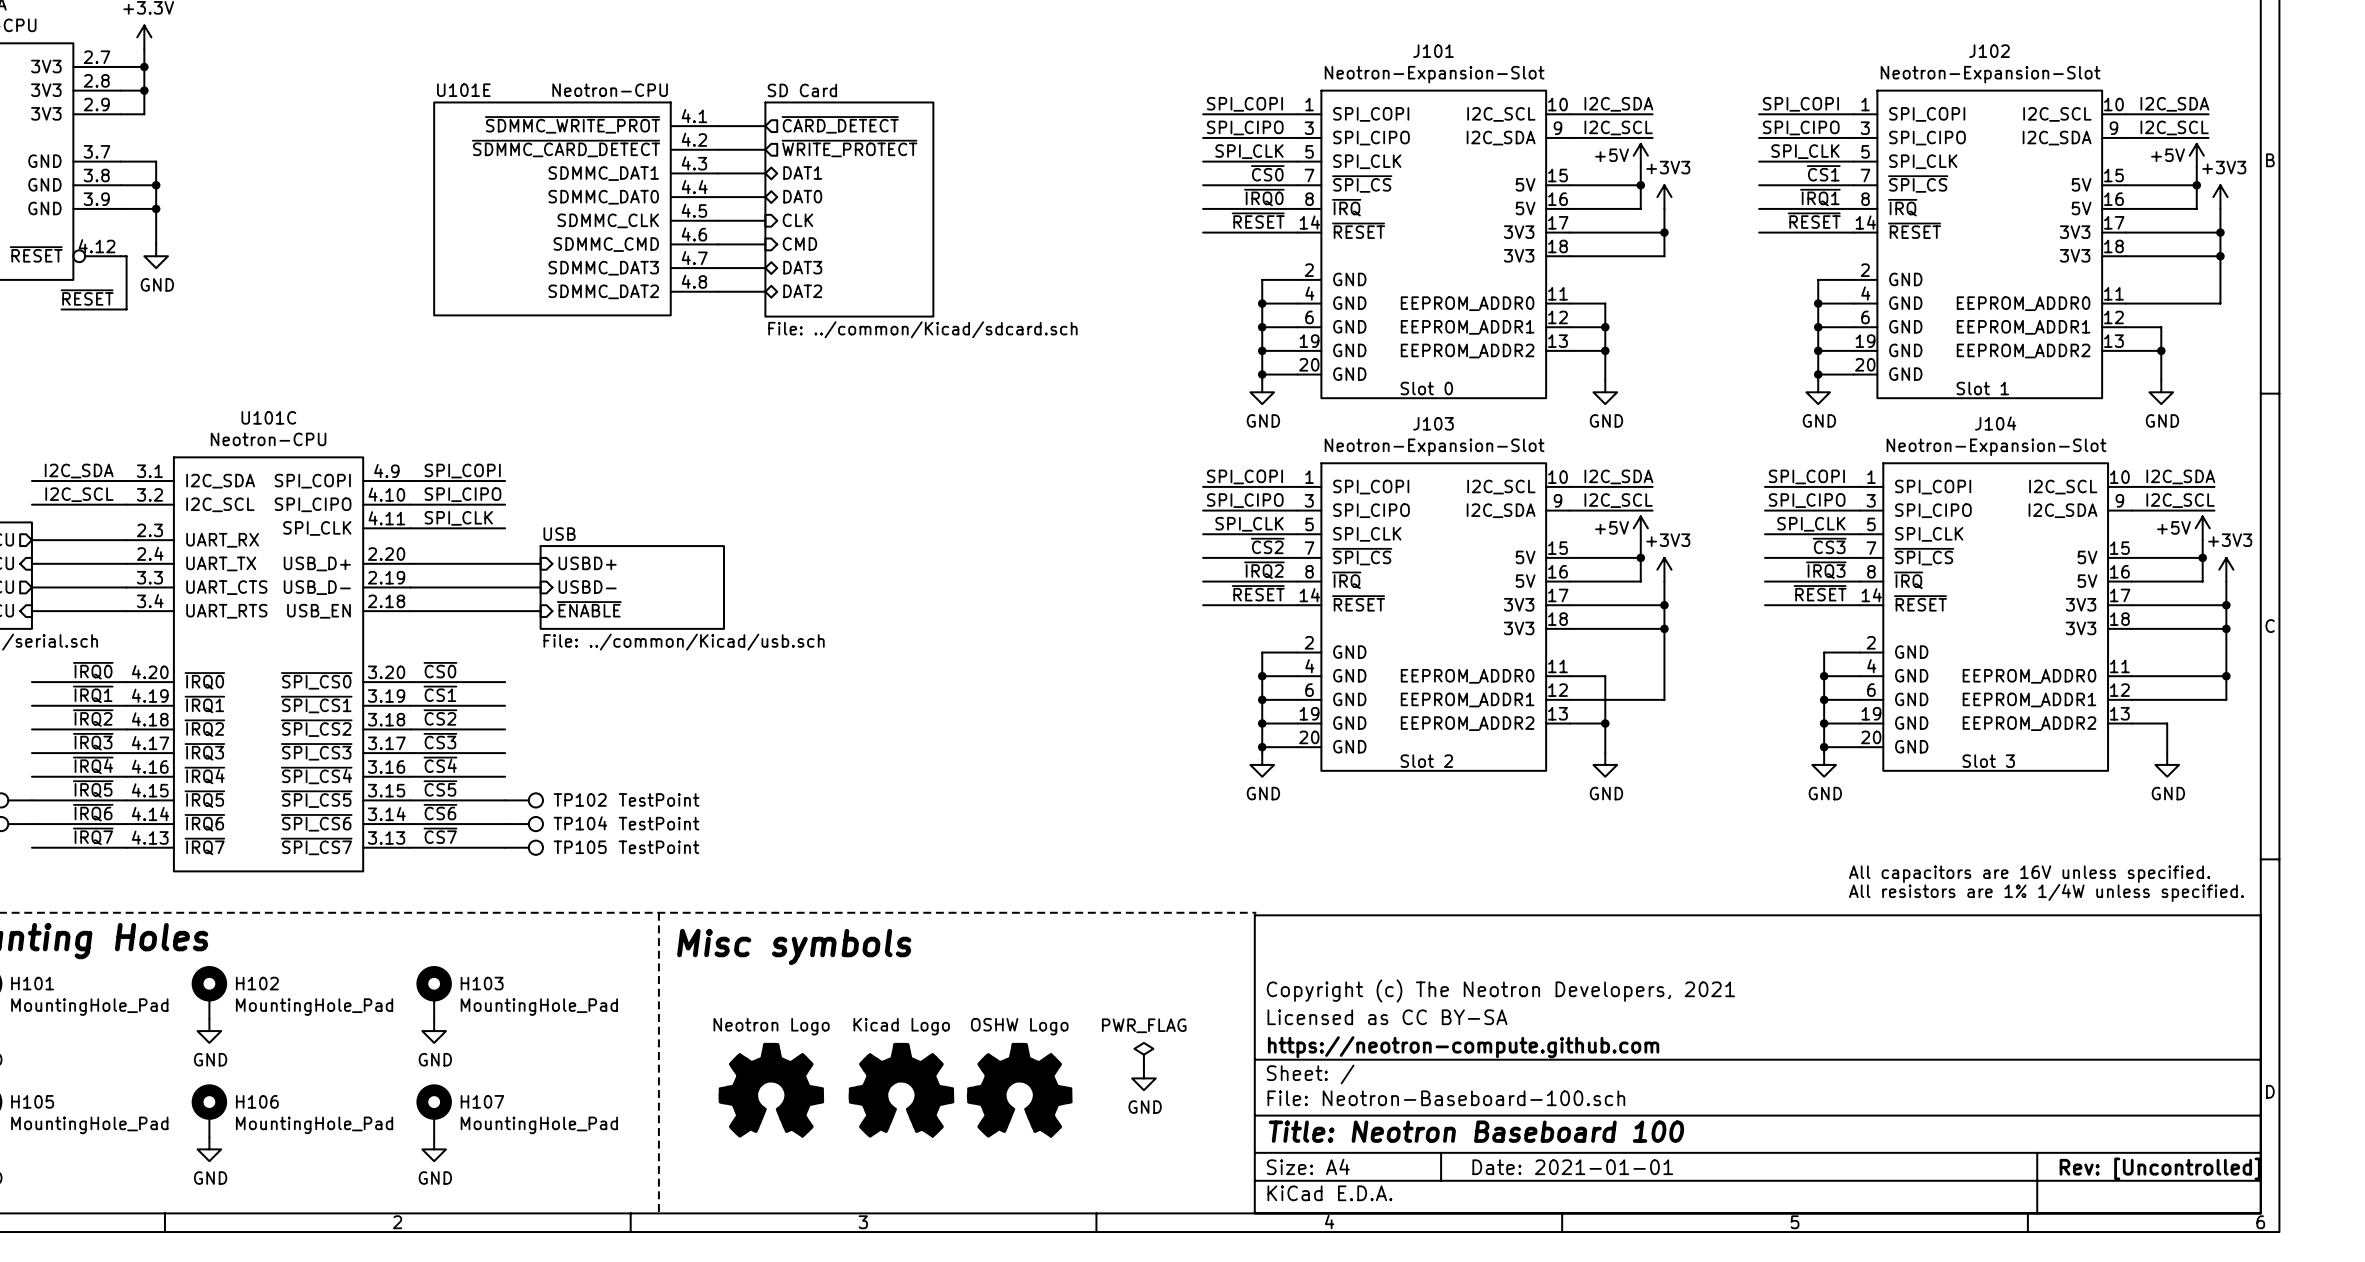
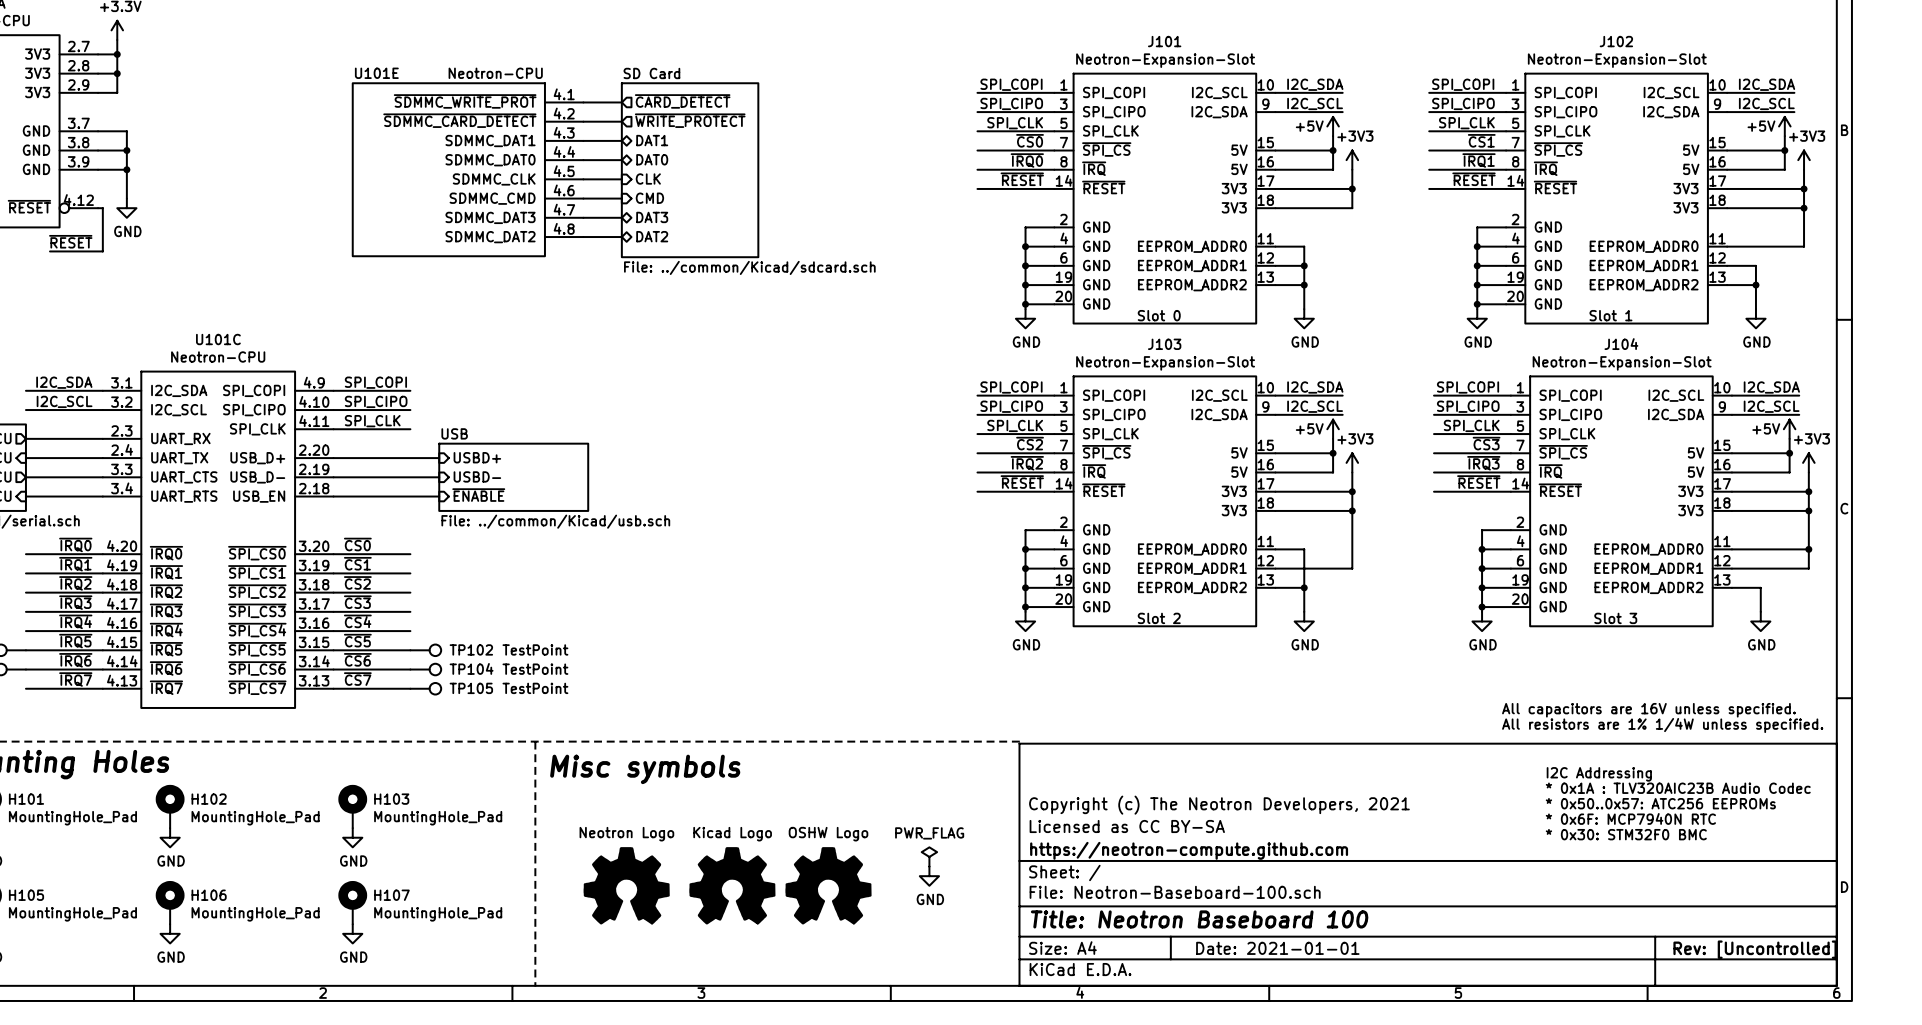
text: none -> I2C Addressing (1599, 774)
text: none -> * 0x1A : TLV320AIC23B Audio Codec (1678, 788)
text: none -> * 0x50..0x57: ATC256 EEPROMs (1660, 803)
text: none -> * 0x6F: MCP7940N RTC (1630, 818)
text: none -> * 0x30: STM32F0 BMC (1626, 834)

